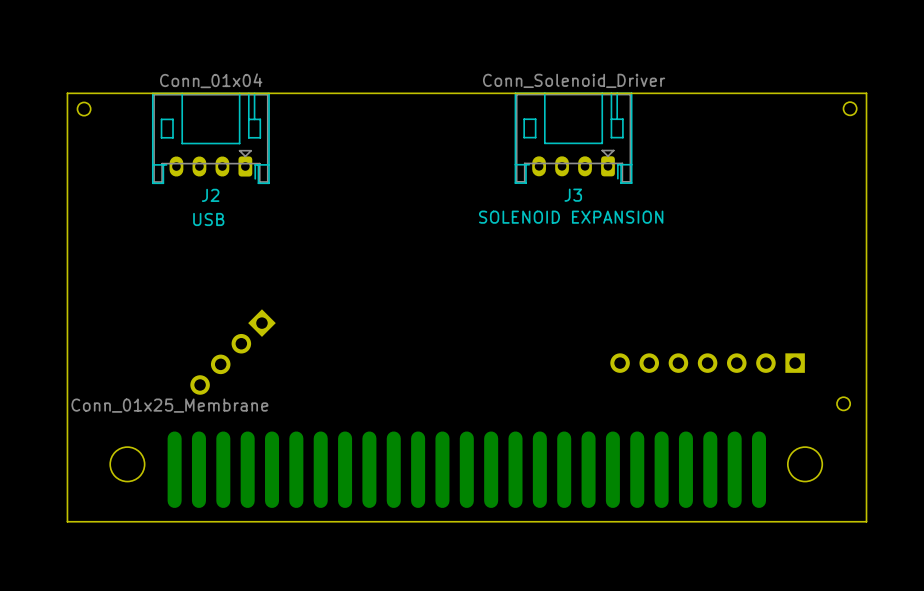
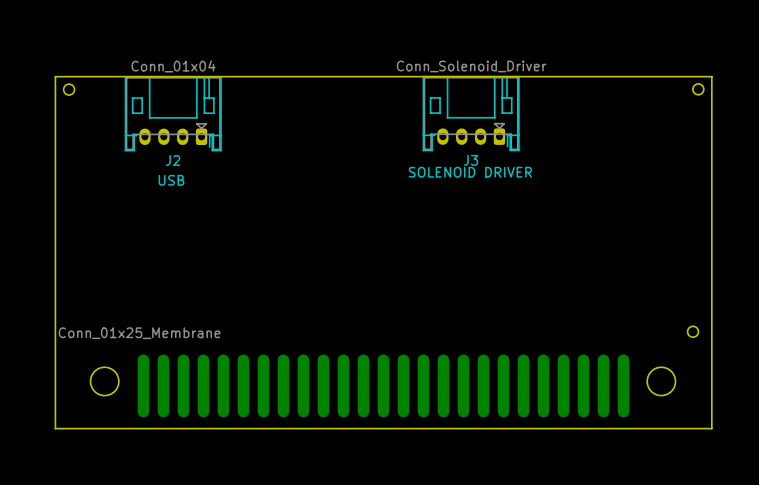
text: SOLENOID EXPANSION (571, 217) -> SOLENOID DRIVER (470, 172)
part: (233, 352) -> none
part: (707, 363) -> none

